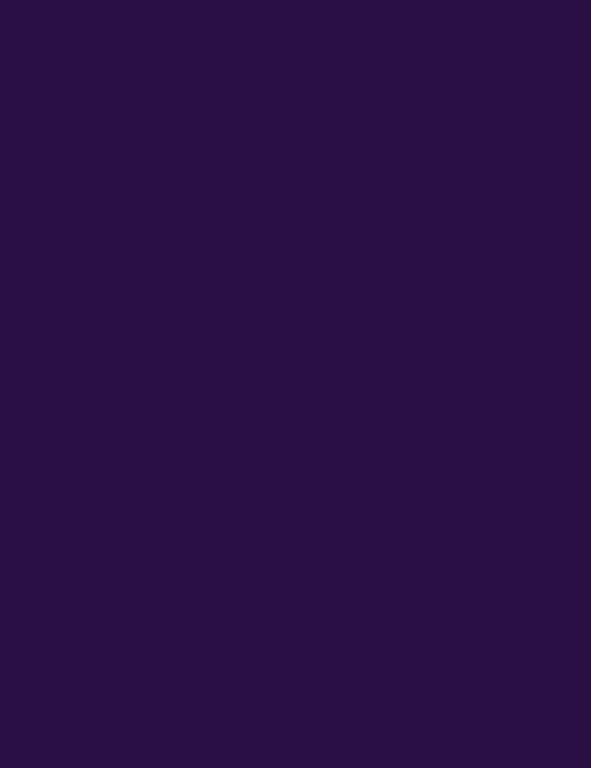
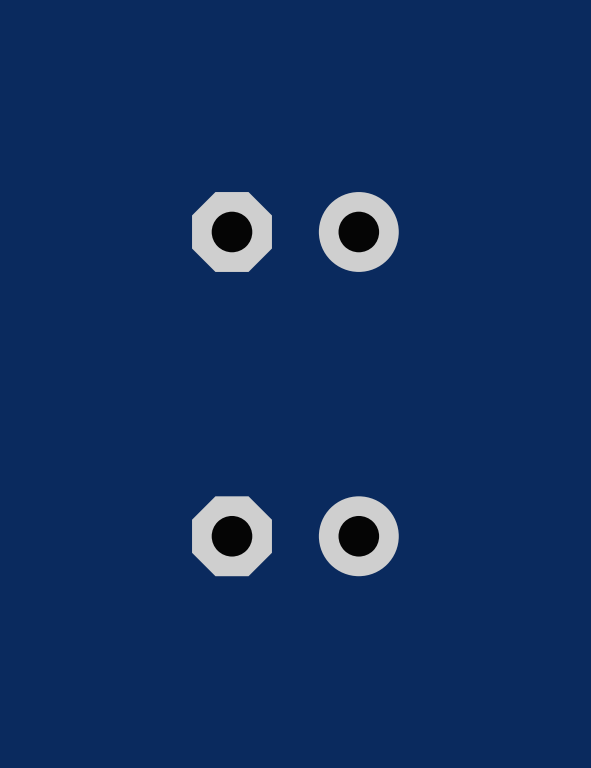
part: none -> (295, 231)
part: none -> (295, 536)

